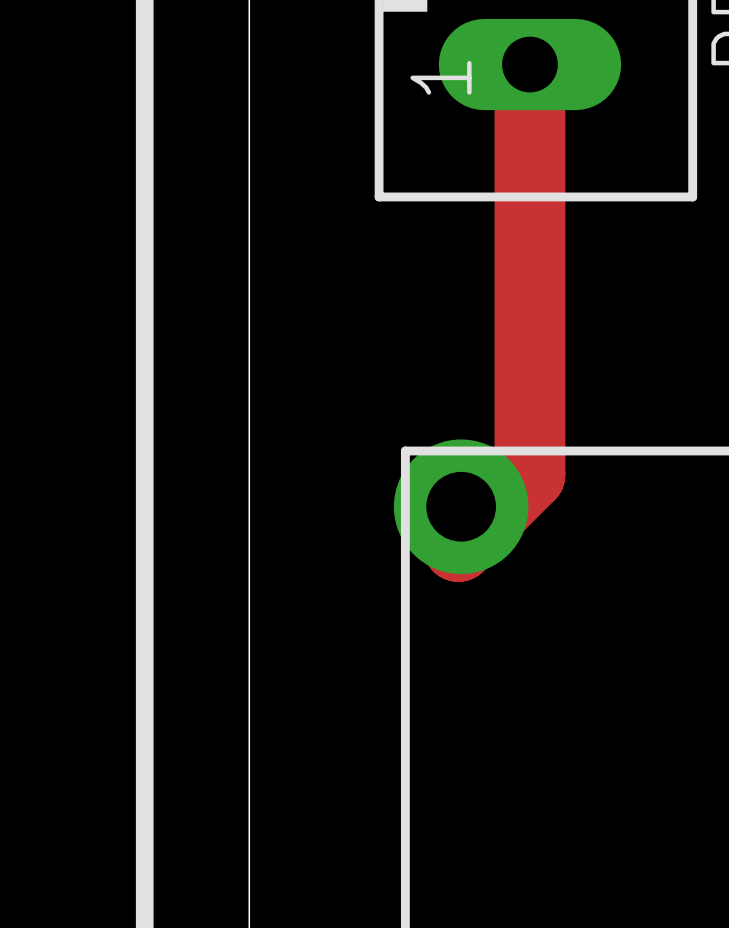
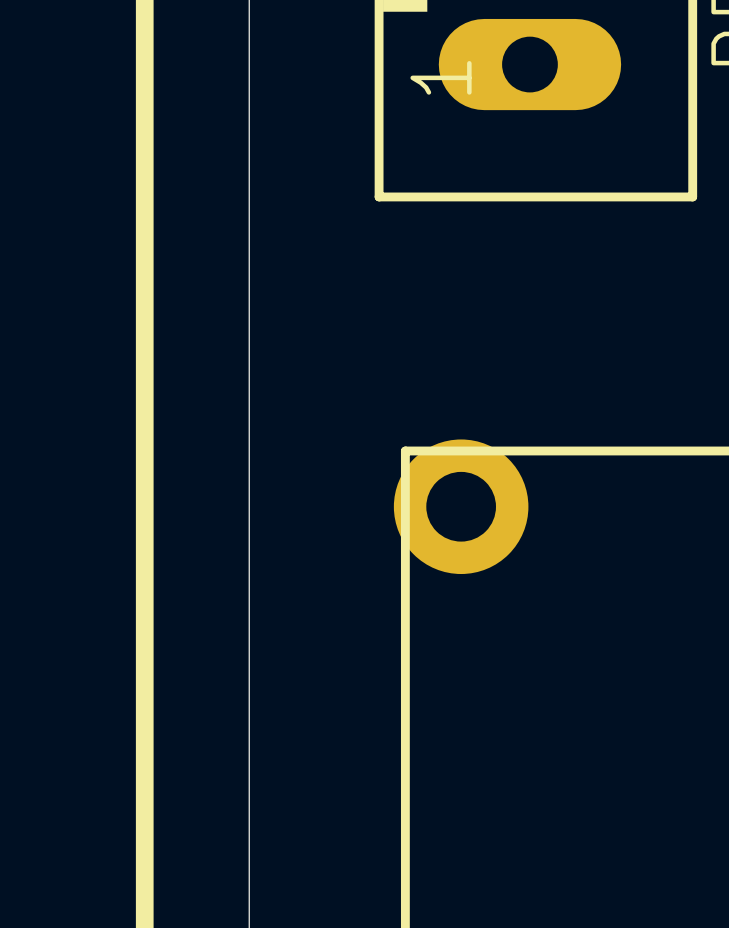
track: (529, 64) (529, 474) (458, 546) (458, 509) (461, 506) -> none

